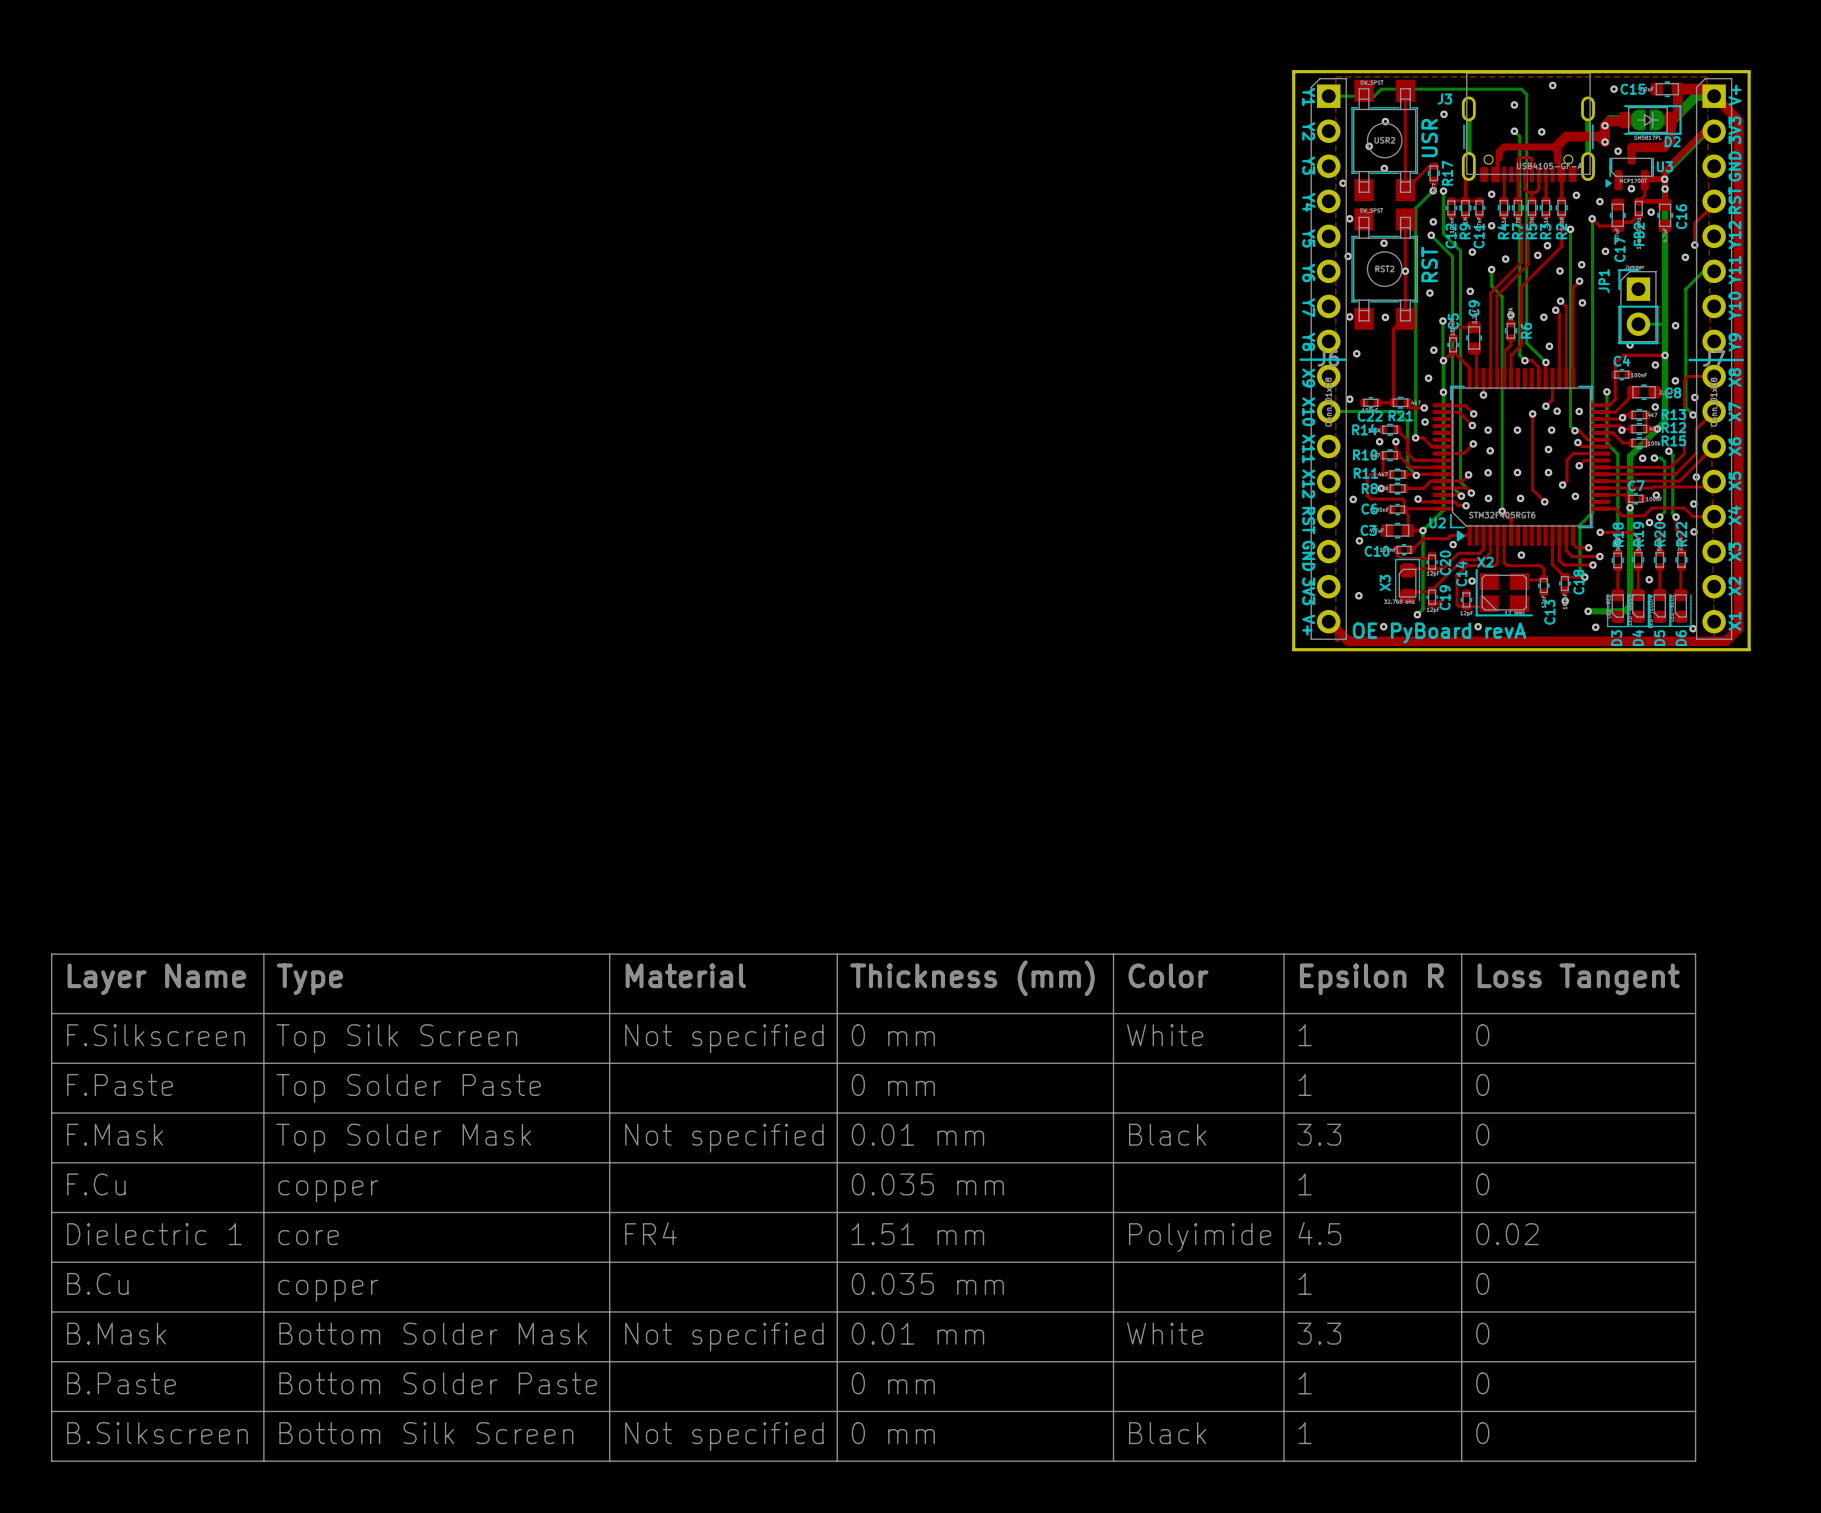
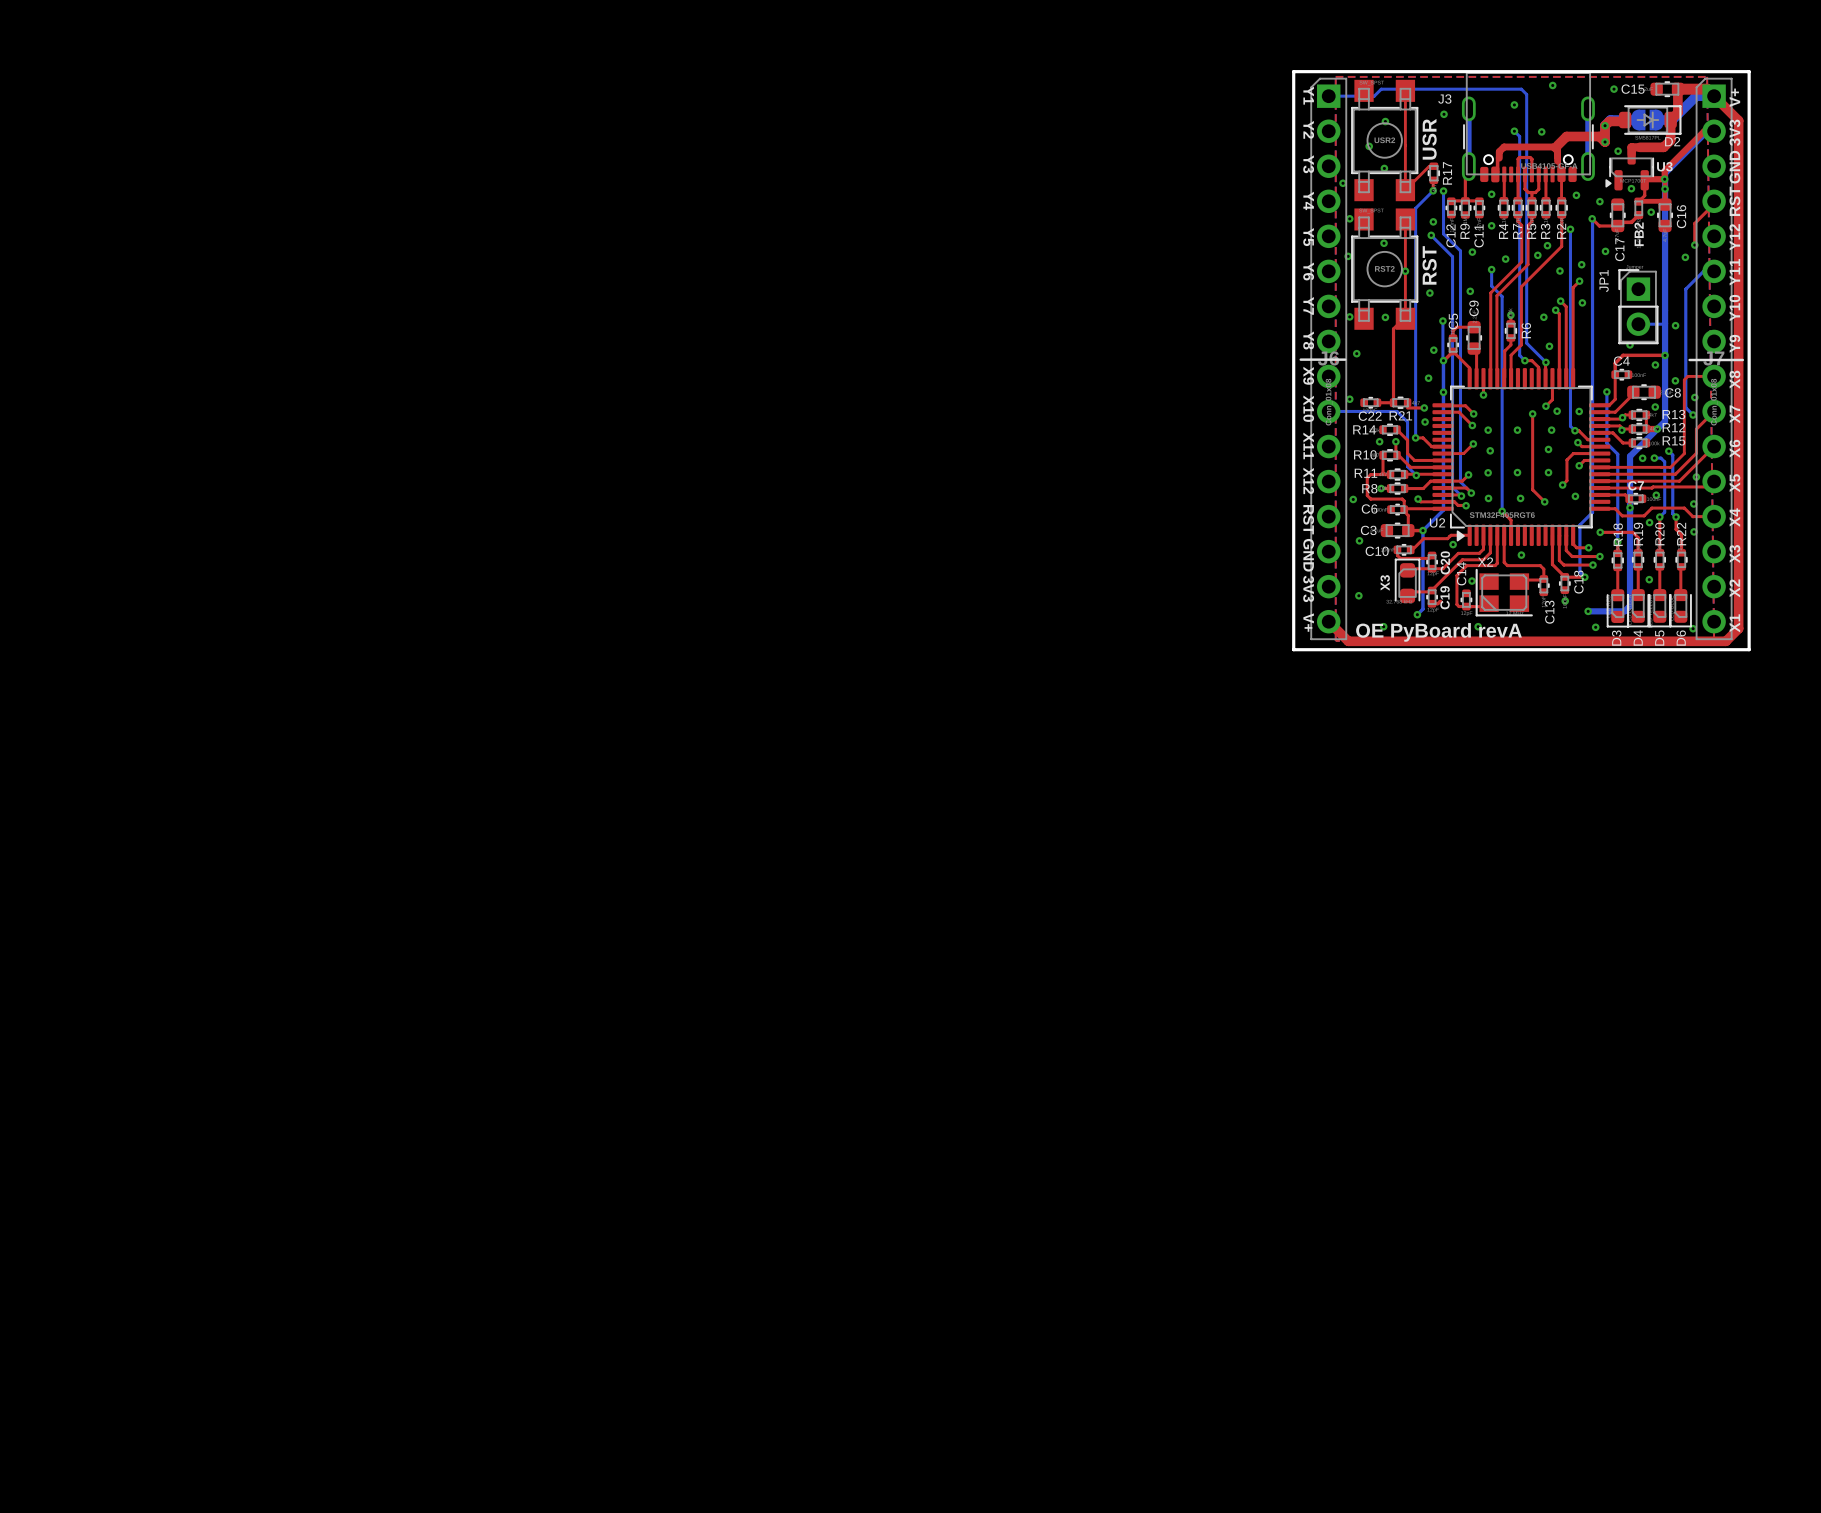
line: (51, 954) (1695, 954) (1695, 1461) (51, 1461) (51, 954) -> none
line: (263, 954) (263, 1461) -> none
line: (609, 954) (609, 1461) -> none
line: (837, 954) (837, 1461) -> none
line: (1113, 954) (1113, 1461) -> none
line: (1283, 954) (1283, 1461) -> none
line: (1461, 954) (1461, 1461) -> none
text: Material (685, 975) -> none
text: Color (1168, 975) -> none
text: Thickness (mm) (972, 978) -> none
text: Layer Name (156, 979) -> none
text: Type (309, 979) -> none
text: Epsilon R (1371, 979) -> none
text: Loss Tangent (1578, 979) -> none
line: (51, 1013) (1695, 1013) -> none
text: F.Silkscreen (156, 1035) -> none
text: 0 mm (893, 1035) -> none
text: White (1165, 1035) -> none
text: 1 (1305, 1035) -> none
text: 0 (1482, 1035) -> none
text: Top Silk Screen (396, 1038) -> none
text: Not specified (724, 1038) -> none
line: (51, 1063) (1695, 1063) -> none
text: F.Paste (120, 1084) -> none
text: 0 mm (893, 1084) -> none
text: 1 (1305, 1084) -> none
text: 0 (1482, 1084) -> none
text: Top Solder Paste (408, 1088) -> none
line: (51, 1113) (1695, 1113) -> none
text: F.Mask (115, 1134) -> none
text: 0.01 mm (917, 1134) -> none
text: Black (1167, 1134) -> none
text: 3.3 (1319, 1134) -> none
text: 0 (1482, 1134) -> none
text: Top Solder Mask (403, 1138) -> none
text: Not specified (724, 1138) -> none
line: (51, 1162) (1695, 1162) -> none
text: F.Cu (96, 1184) -> none
text: 0.035 mm (927, 1184) -> none
text: 1 (1305, 1184) -> none
text: 0 (1482, 1184) -> none
text: copper (328, 1191) -> none
line: (51, 1212) (1695, 1212) -> none
text: FR4 (650, 1233) -> none
text: 4.5 (1319, 1233) -> none
text: Dielectric 1 (154, 1234) -> none
text: 1.51 mm (917, 1234) -> none
text: 0.02 (1507, 1234) -> none
text: core (308, 1237) -> none
text: Polyimide (1200, 1237) -> none
line: (51, 1262) (1695, 1262) -> none
text: B.Cu (97, 1283) -> none
text: 0.035 mm (927, 1283) -> none
text: 1 (1305, 1283) -> none
text: 0 (1482, 1283) -> none
text: copper (328, 1290) -> none
line: (51, 1311) (1695, 1311) -> none
text: B.Mask (116, 1333) -> none
text: Bottom Solder Mask (433, 1333) -> none
text: 0.01 mm (917, 1333) -> none
text: White (1165, 1333) -> none
text: 3.3 (1319, 1333) -> none
text: 0 (1482, 1333) -> none
text: Not specified (724, 1337) -> none
line: (51, 1361) (1695, 1361) -> none
text: B.Paste (121, 1383) -> none
text: Bottom Solder Paste (438, 1383) -> none
text: 0 mm (893, 1383) -> none
text: 1 (1305, 1383) -> none
text: 0 (1482, 1383) -> none
line: (51, 1411) (1695, 1411) -> none
text: B.Silkscreen (157, 1433) -> none
text: Bottom Silk Screen (426, 1433) -> none
text: 0 mm (893, 1433) -> none
text: Black (1167, 1433) -> none
text: 1 (1305, 1433) -> none
text: 0 (1482, 1433) -> none
text: Not specified (724, 1436) -> none

